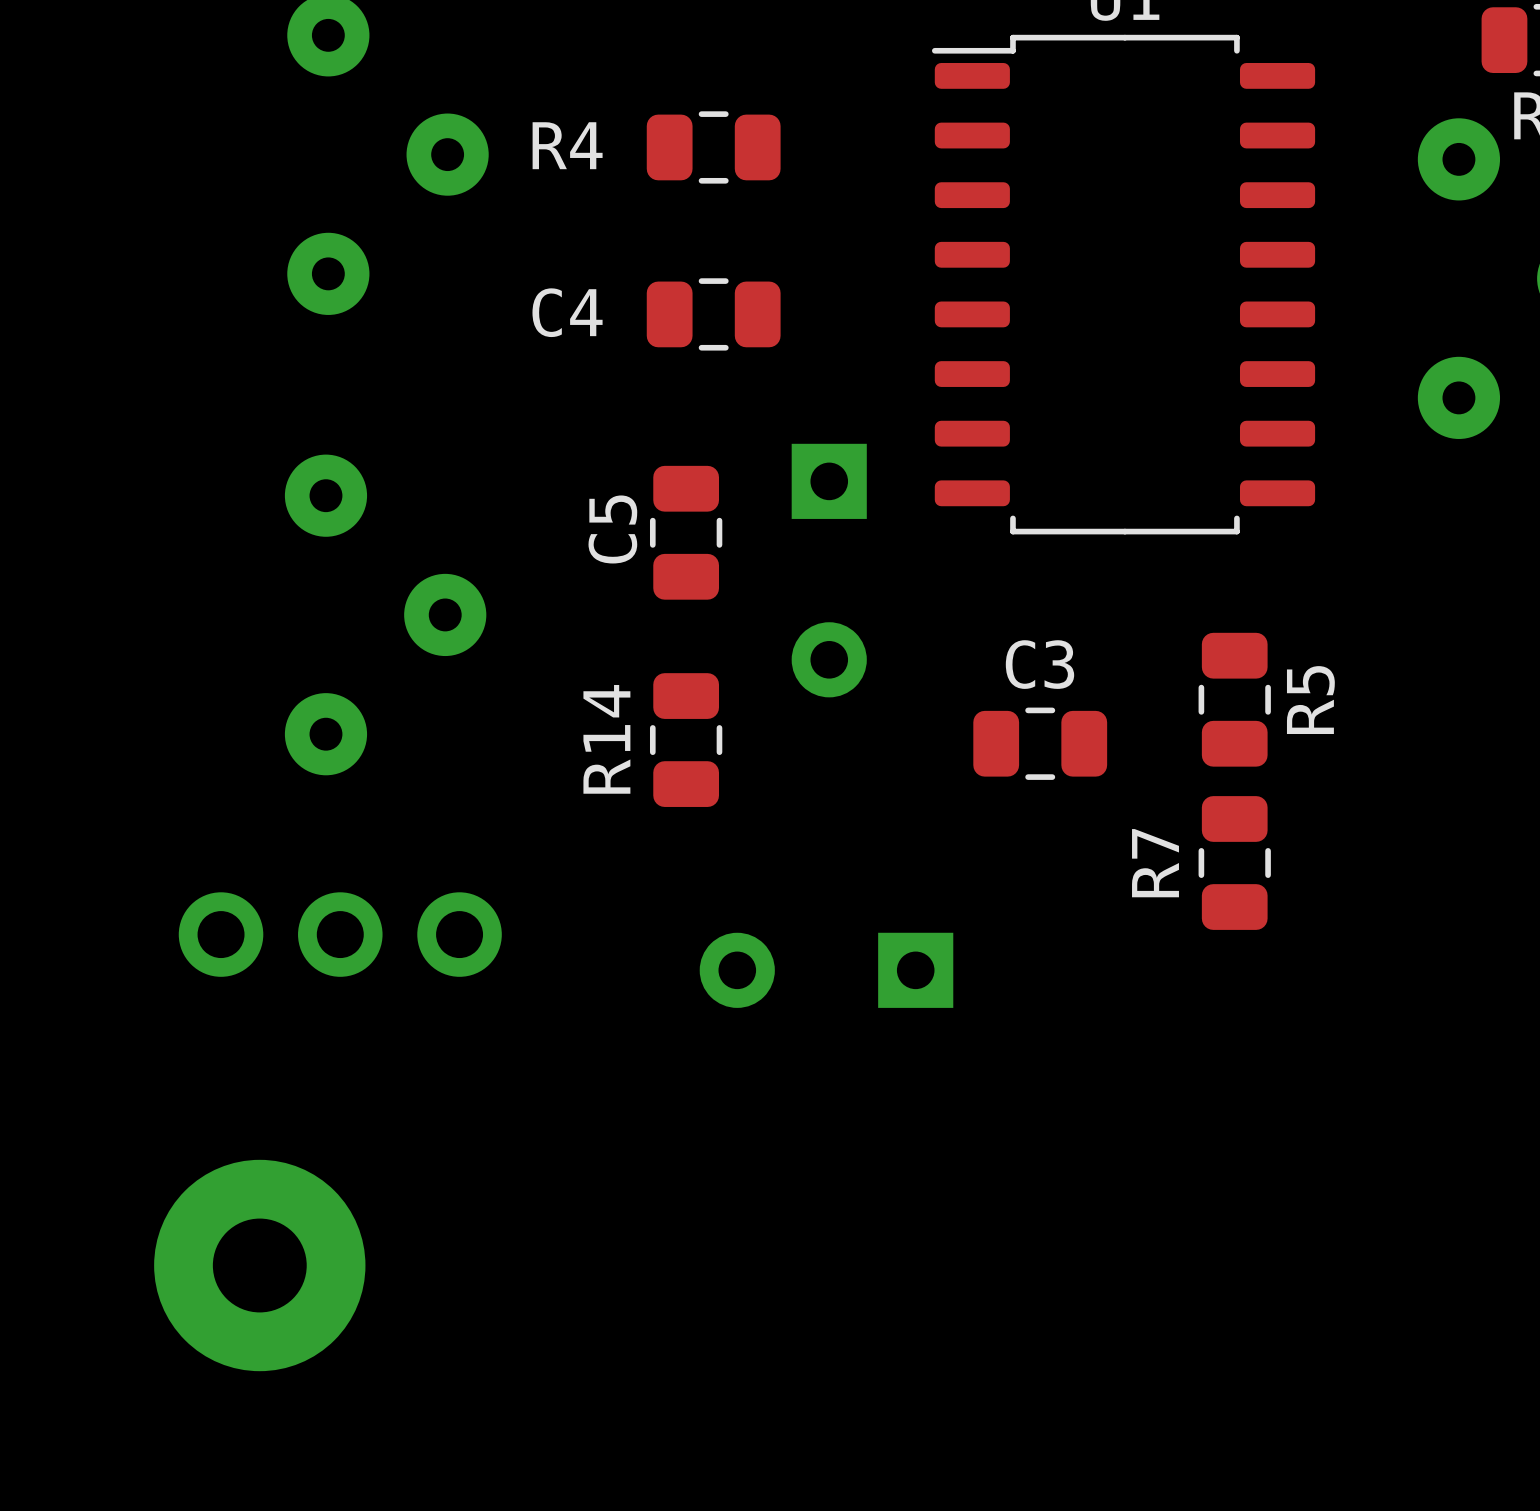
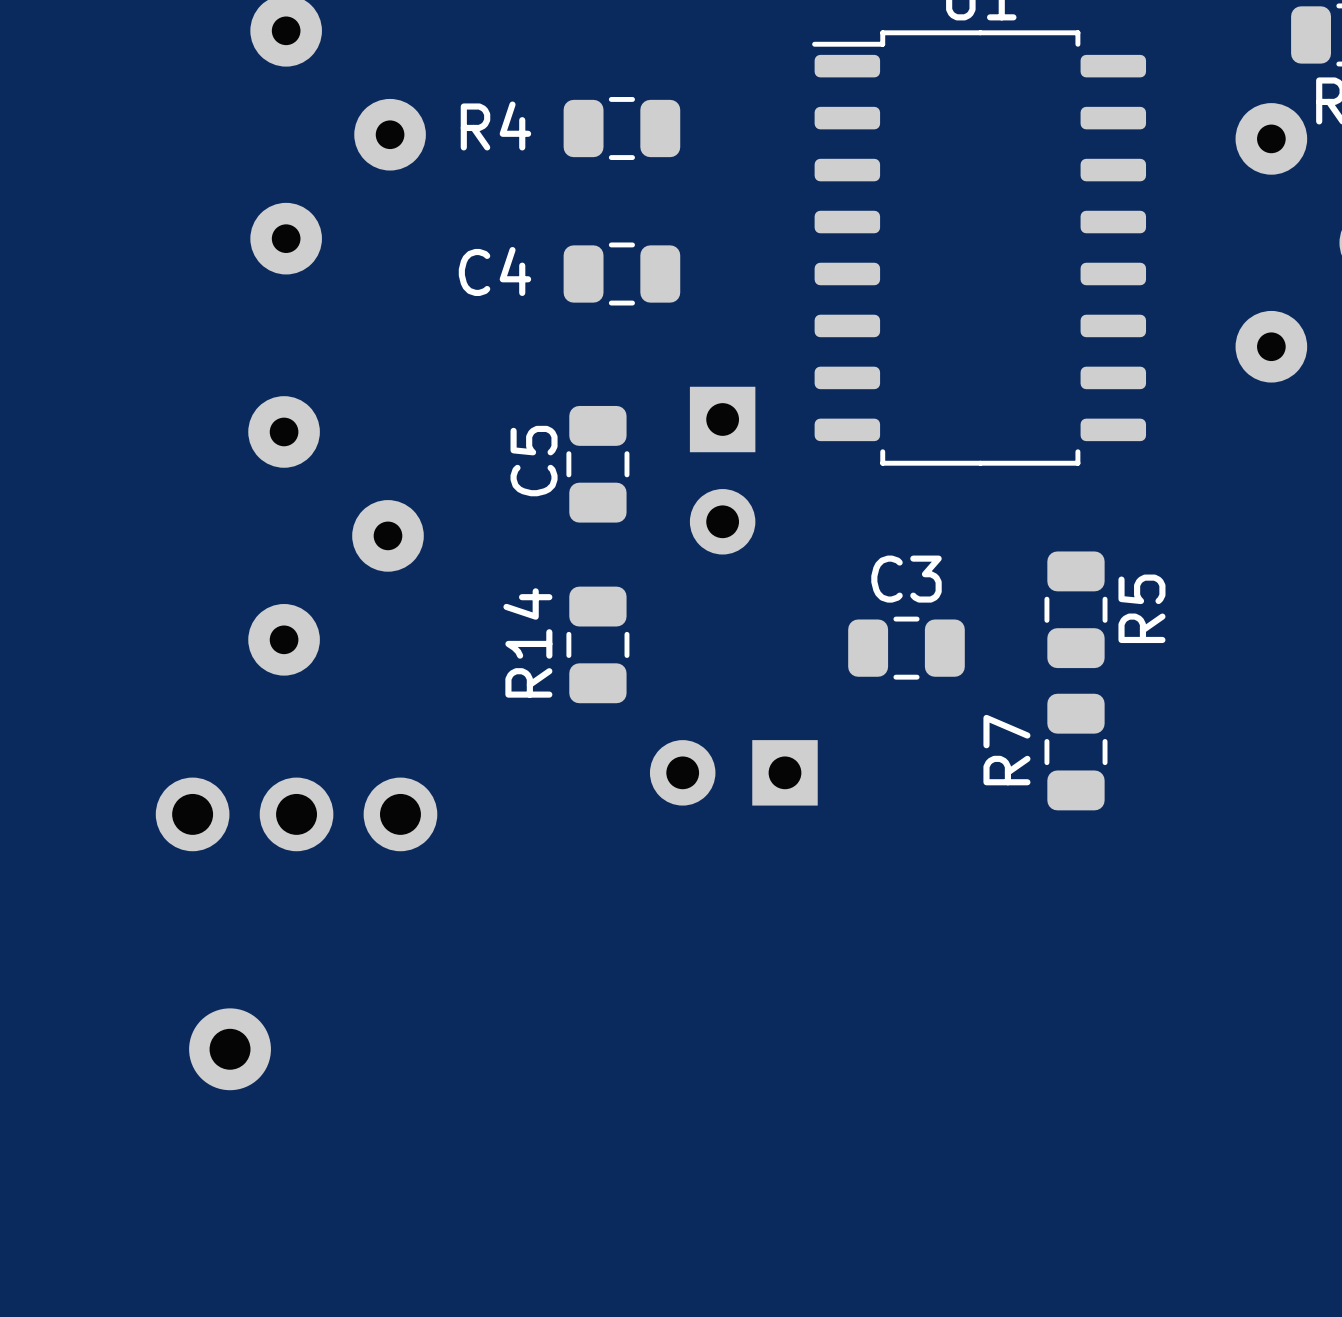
part footprint: [791, 443, 867, 698] -> [689, 386, 756, 555]
part: none -> (733, 772)
part: (826, 970) -> none
part: none -> (230, 1049)
part: (259, 1265) -> none

